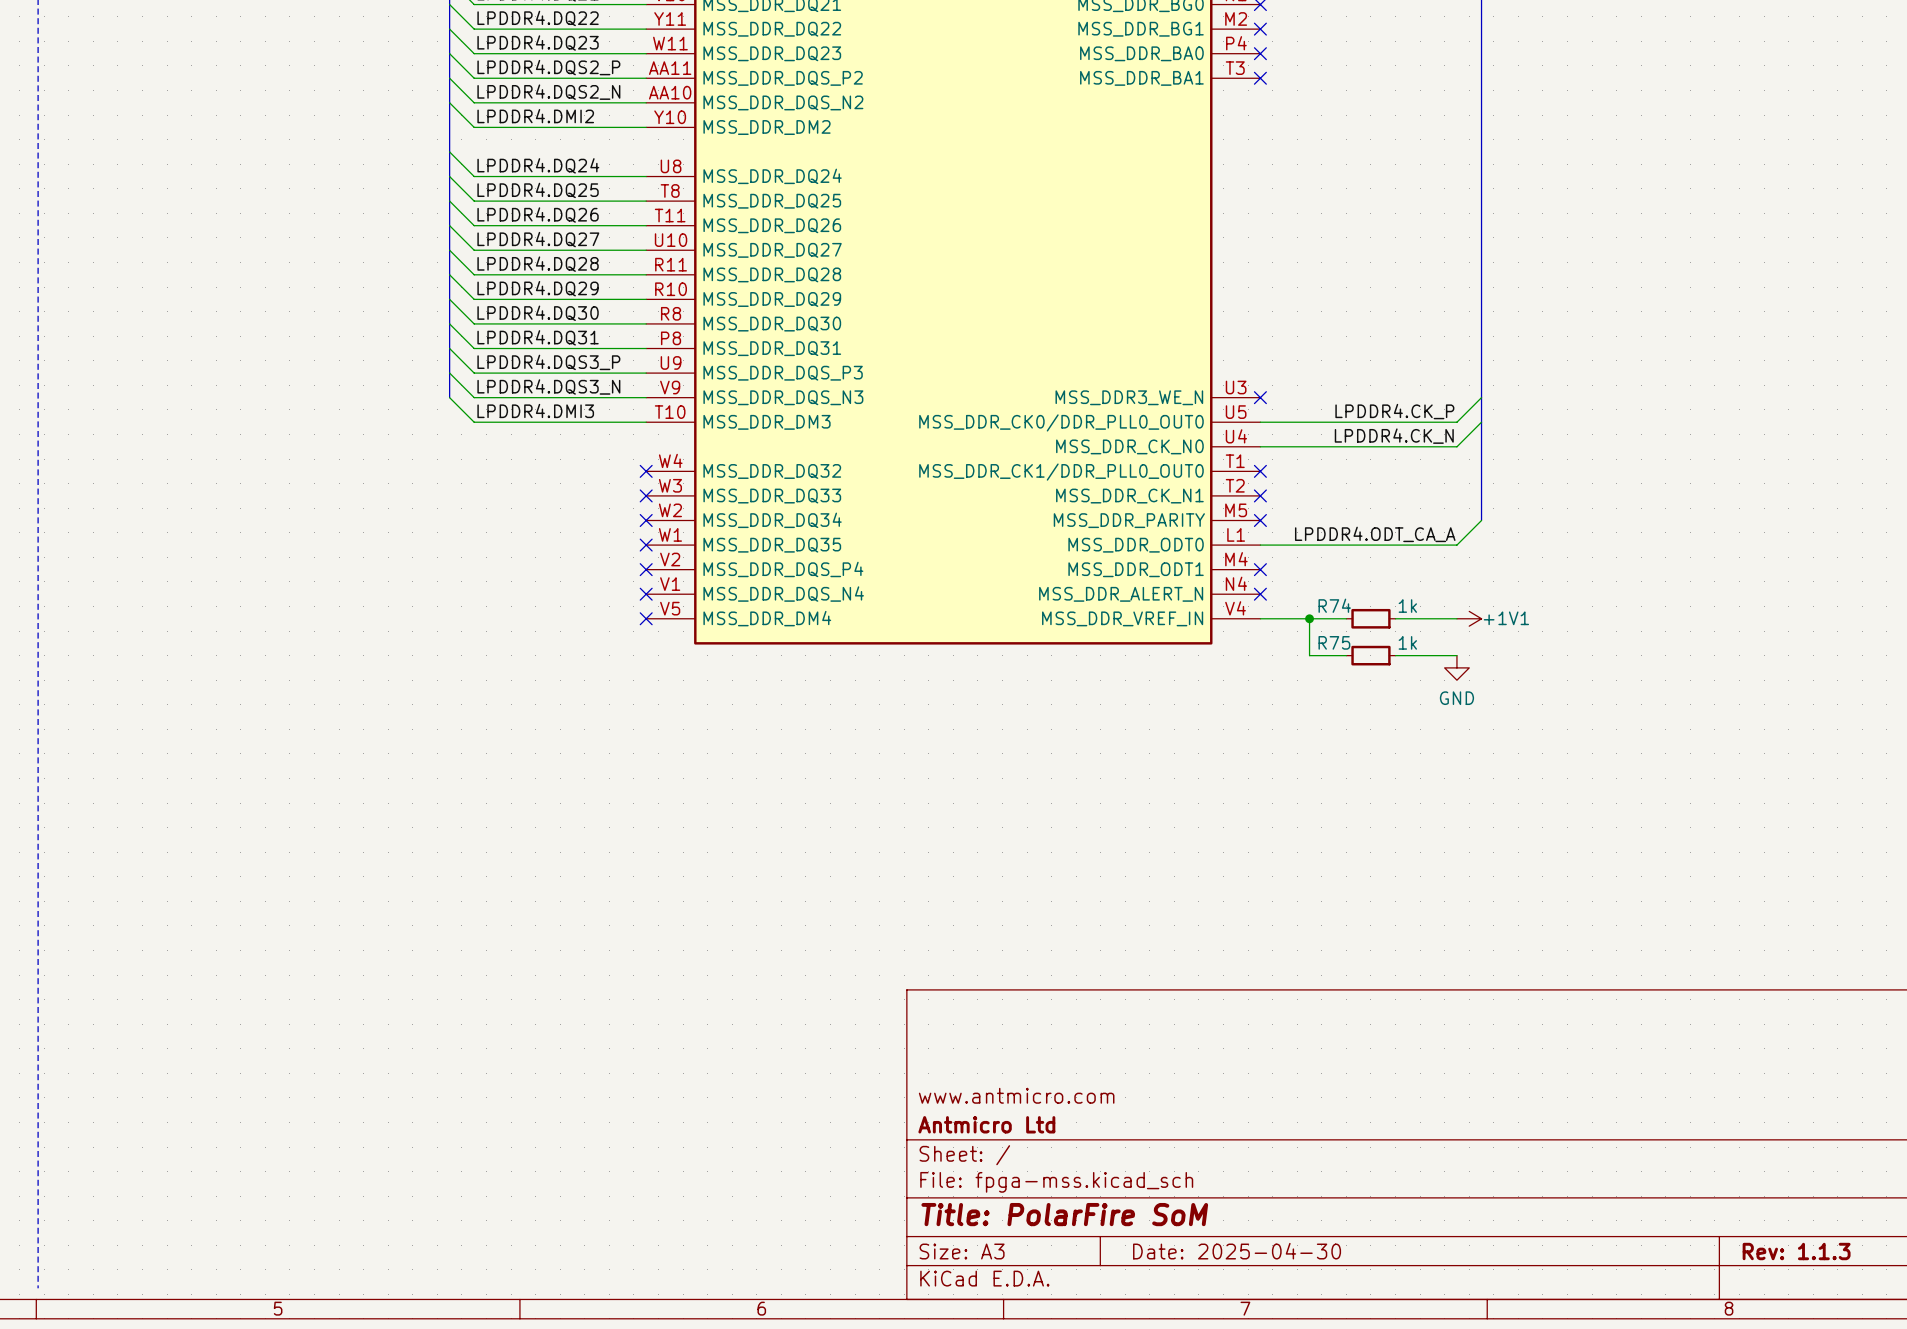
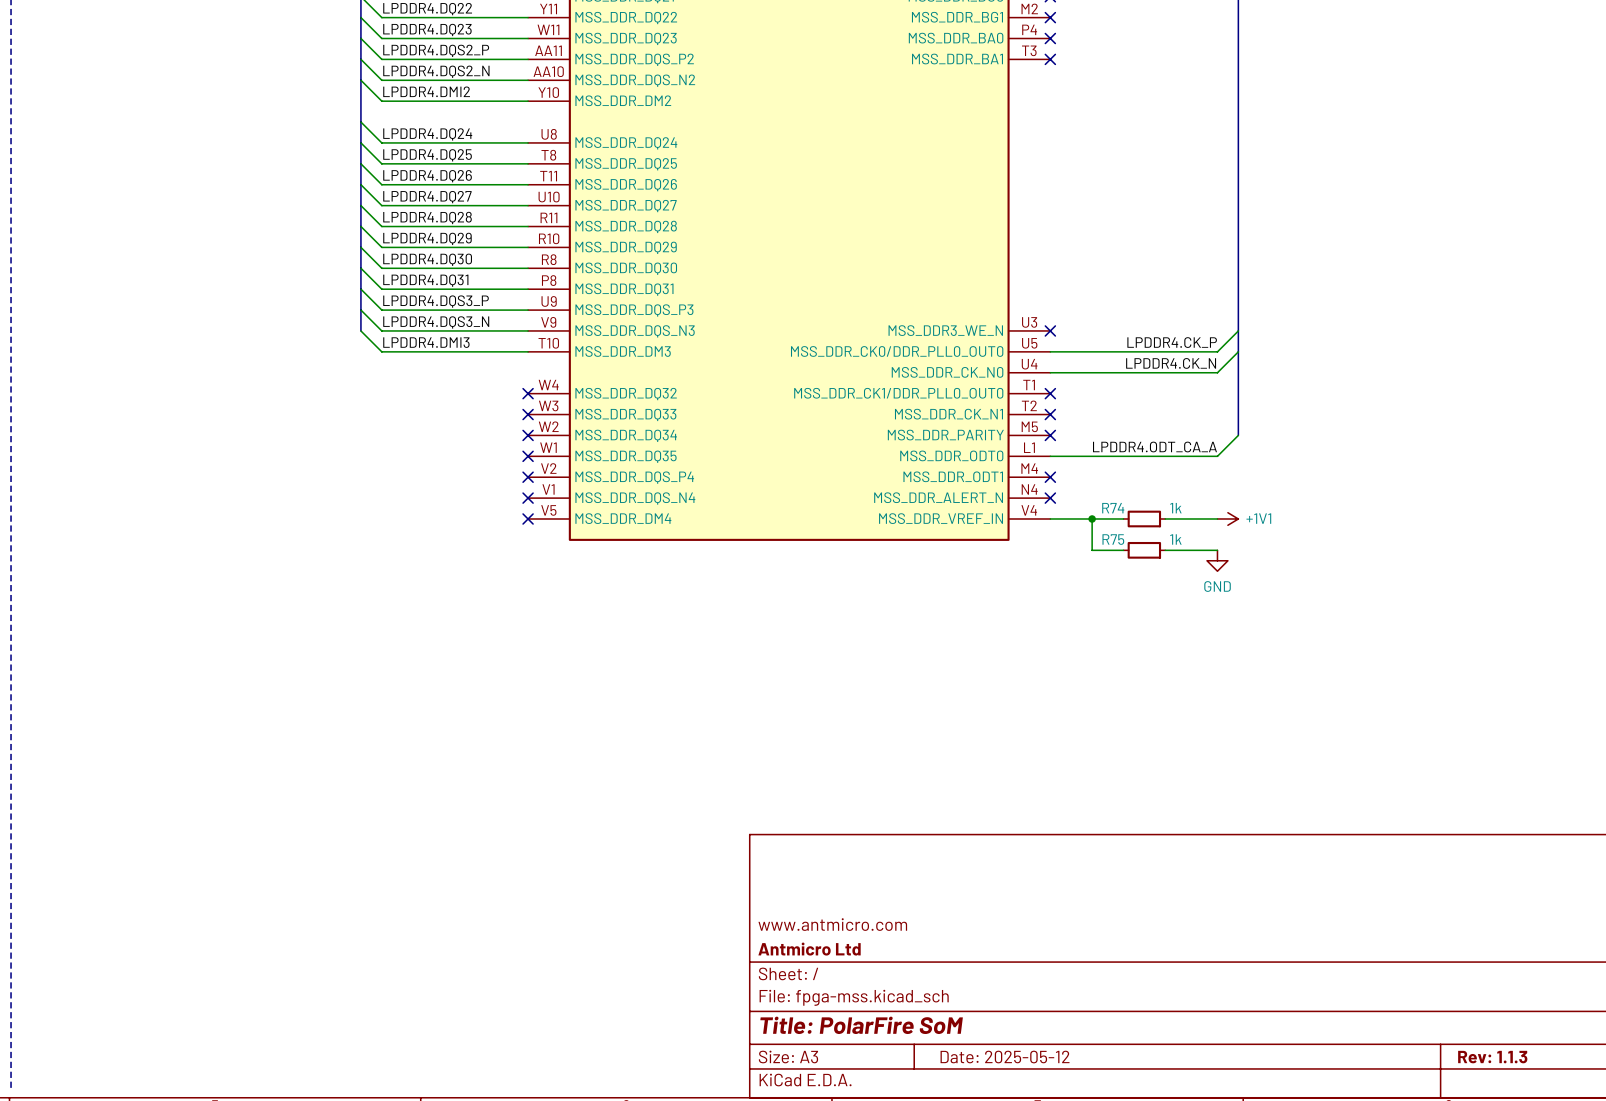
title block: Date: 2025-04-30 (1237, 1251) -> Date: 2025-05-12 (1005, 1057)

